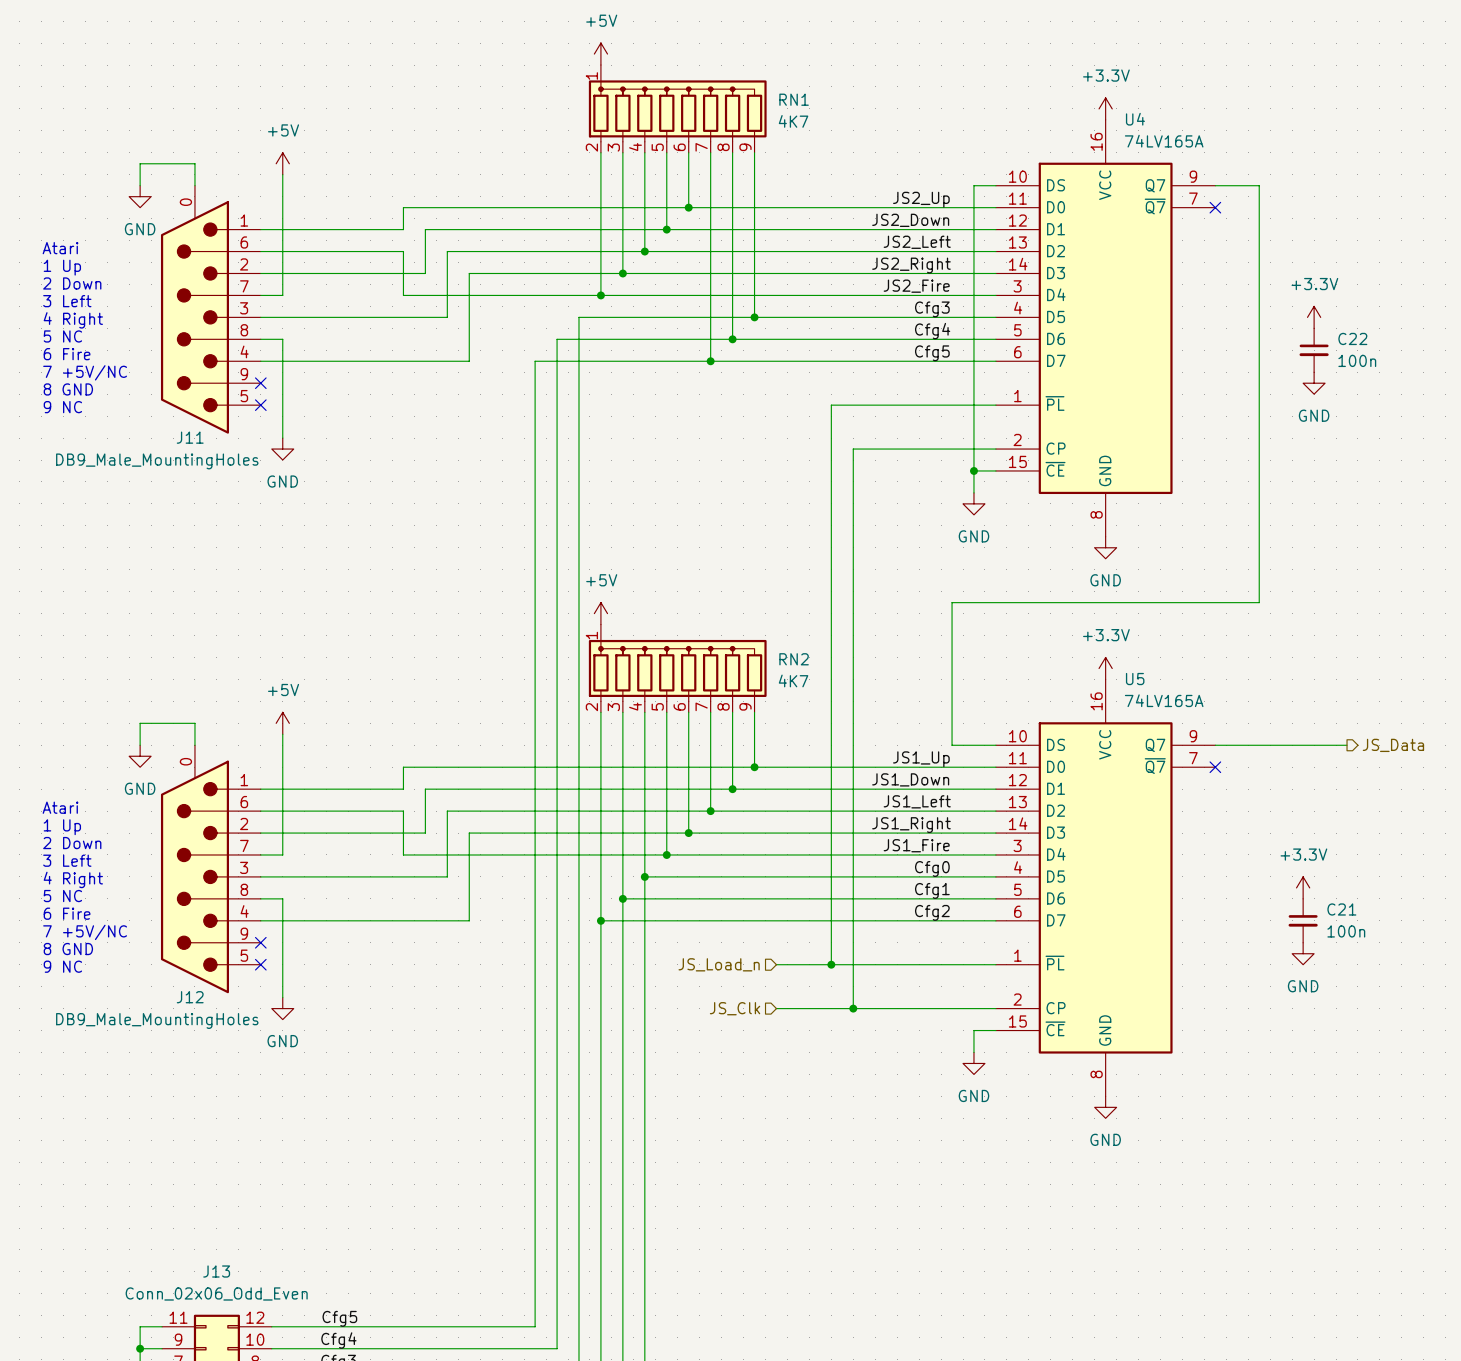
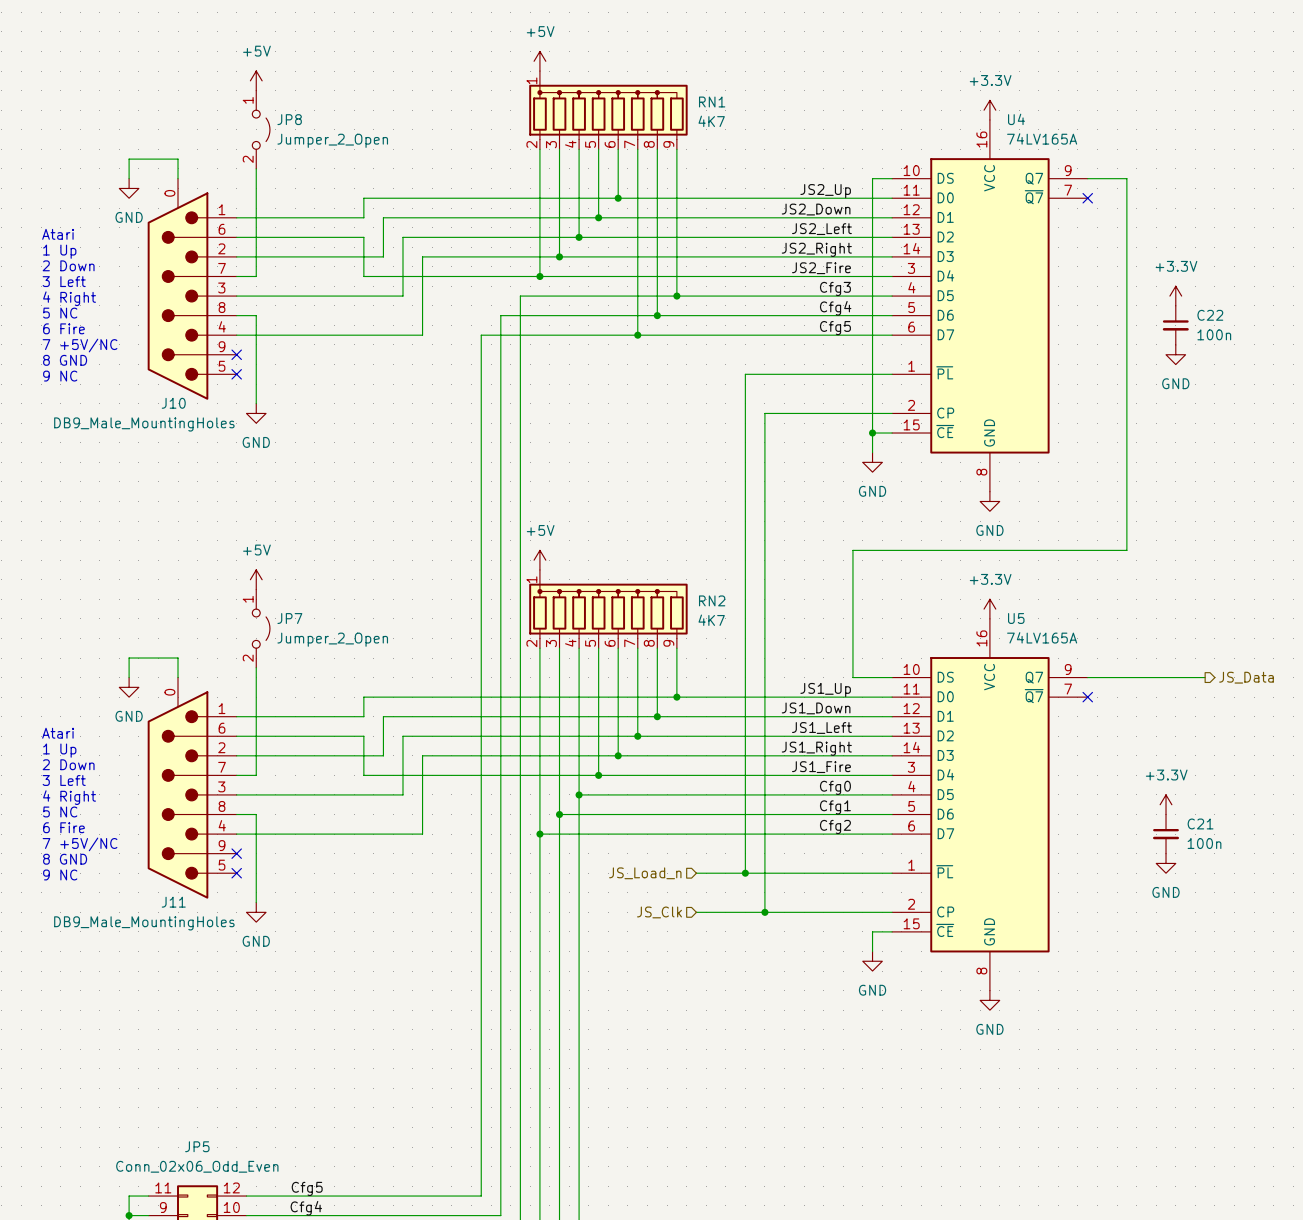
JP8: none -> Jumper_2_Open (261, 129)
power symbol position: +5V (282, 163) -> +5V (256, 80)
J11 name: J11 (190, 437) -> J10 (173, 403)
JP7: none -> Jumper_2_Open (261, 628)
power symbol position: +5V (282, 723) -> +5V (256, 579)
J12 name: J12 (190, 997) -> J11 (173, 902)
J13 name: J13 (216, 1271) -> JP5 (197, 1146)

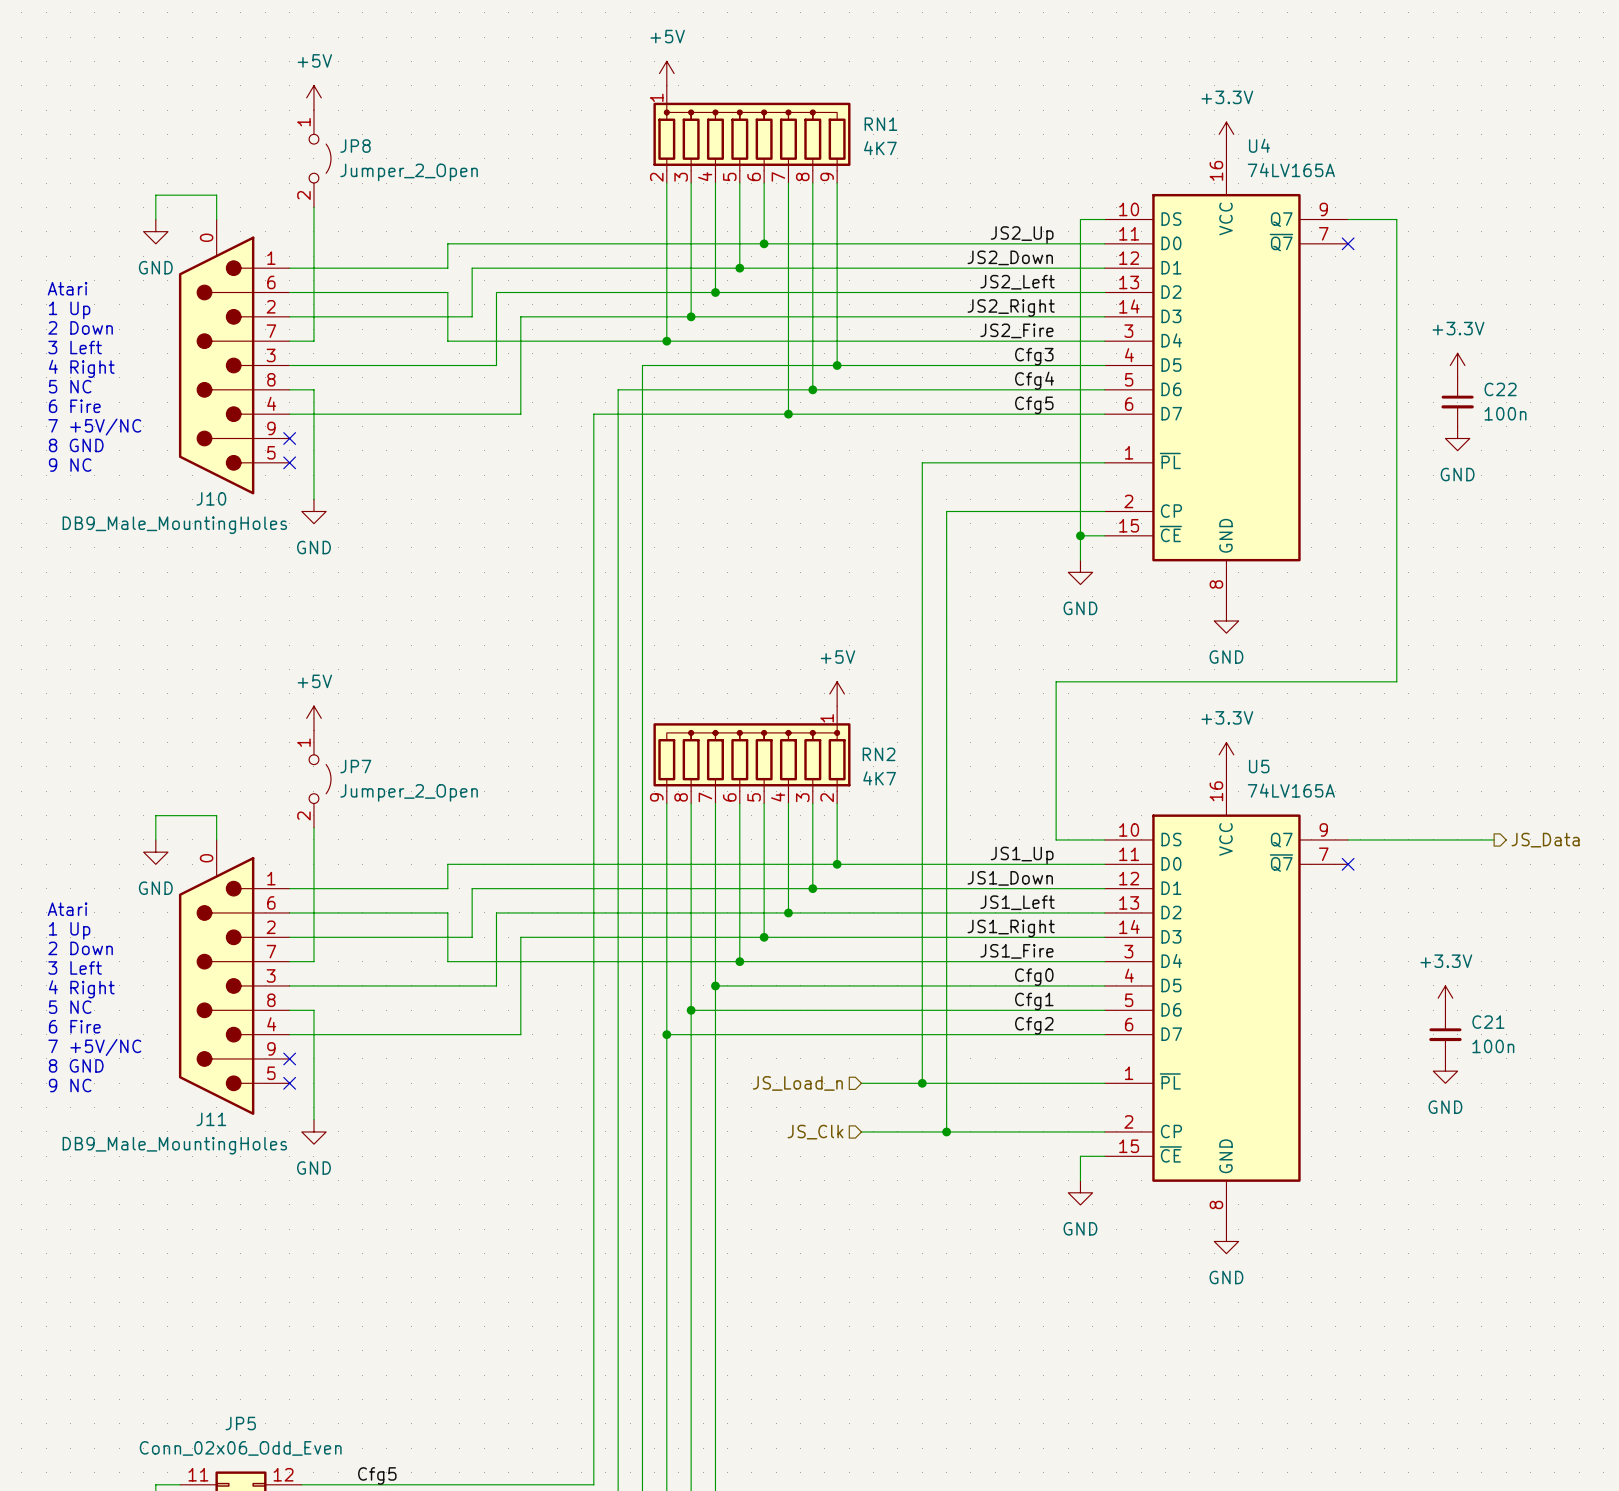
power symbol position: +5V (539, 560) -> +5V (837, 693)
RN2 flip: as is (608, 611) -> left-right (751, 757)

